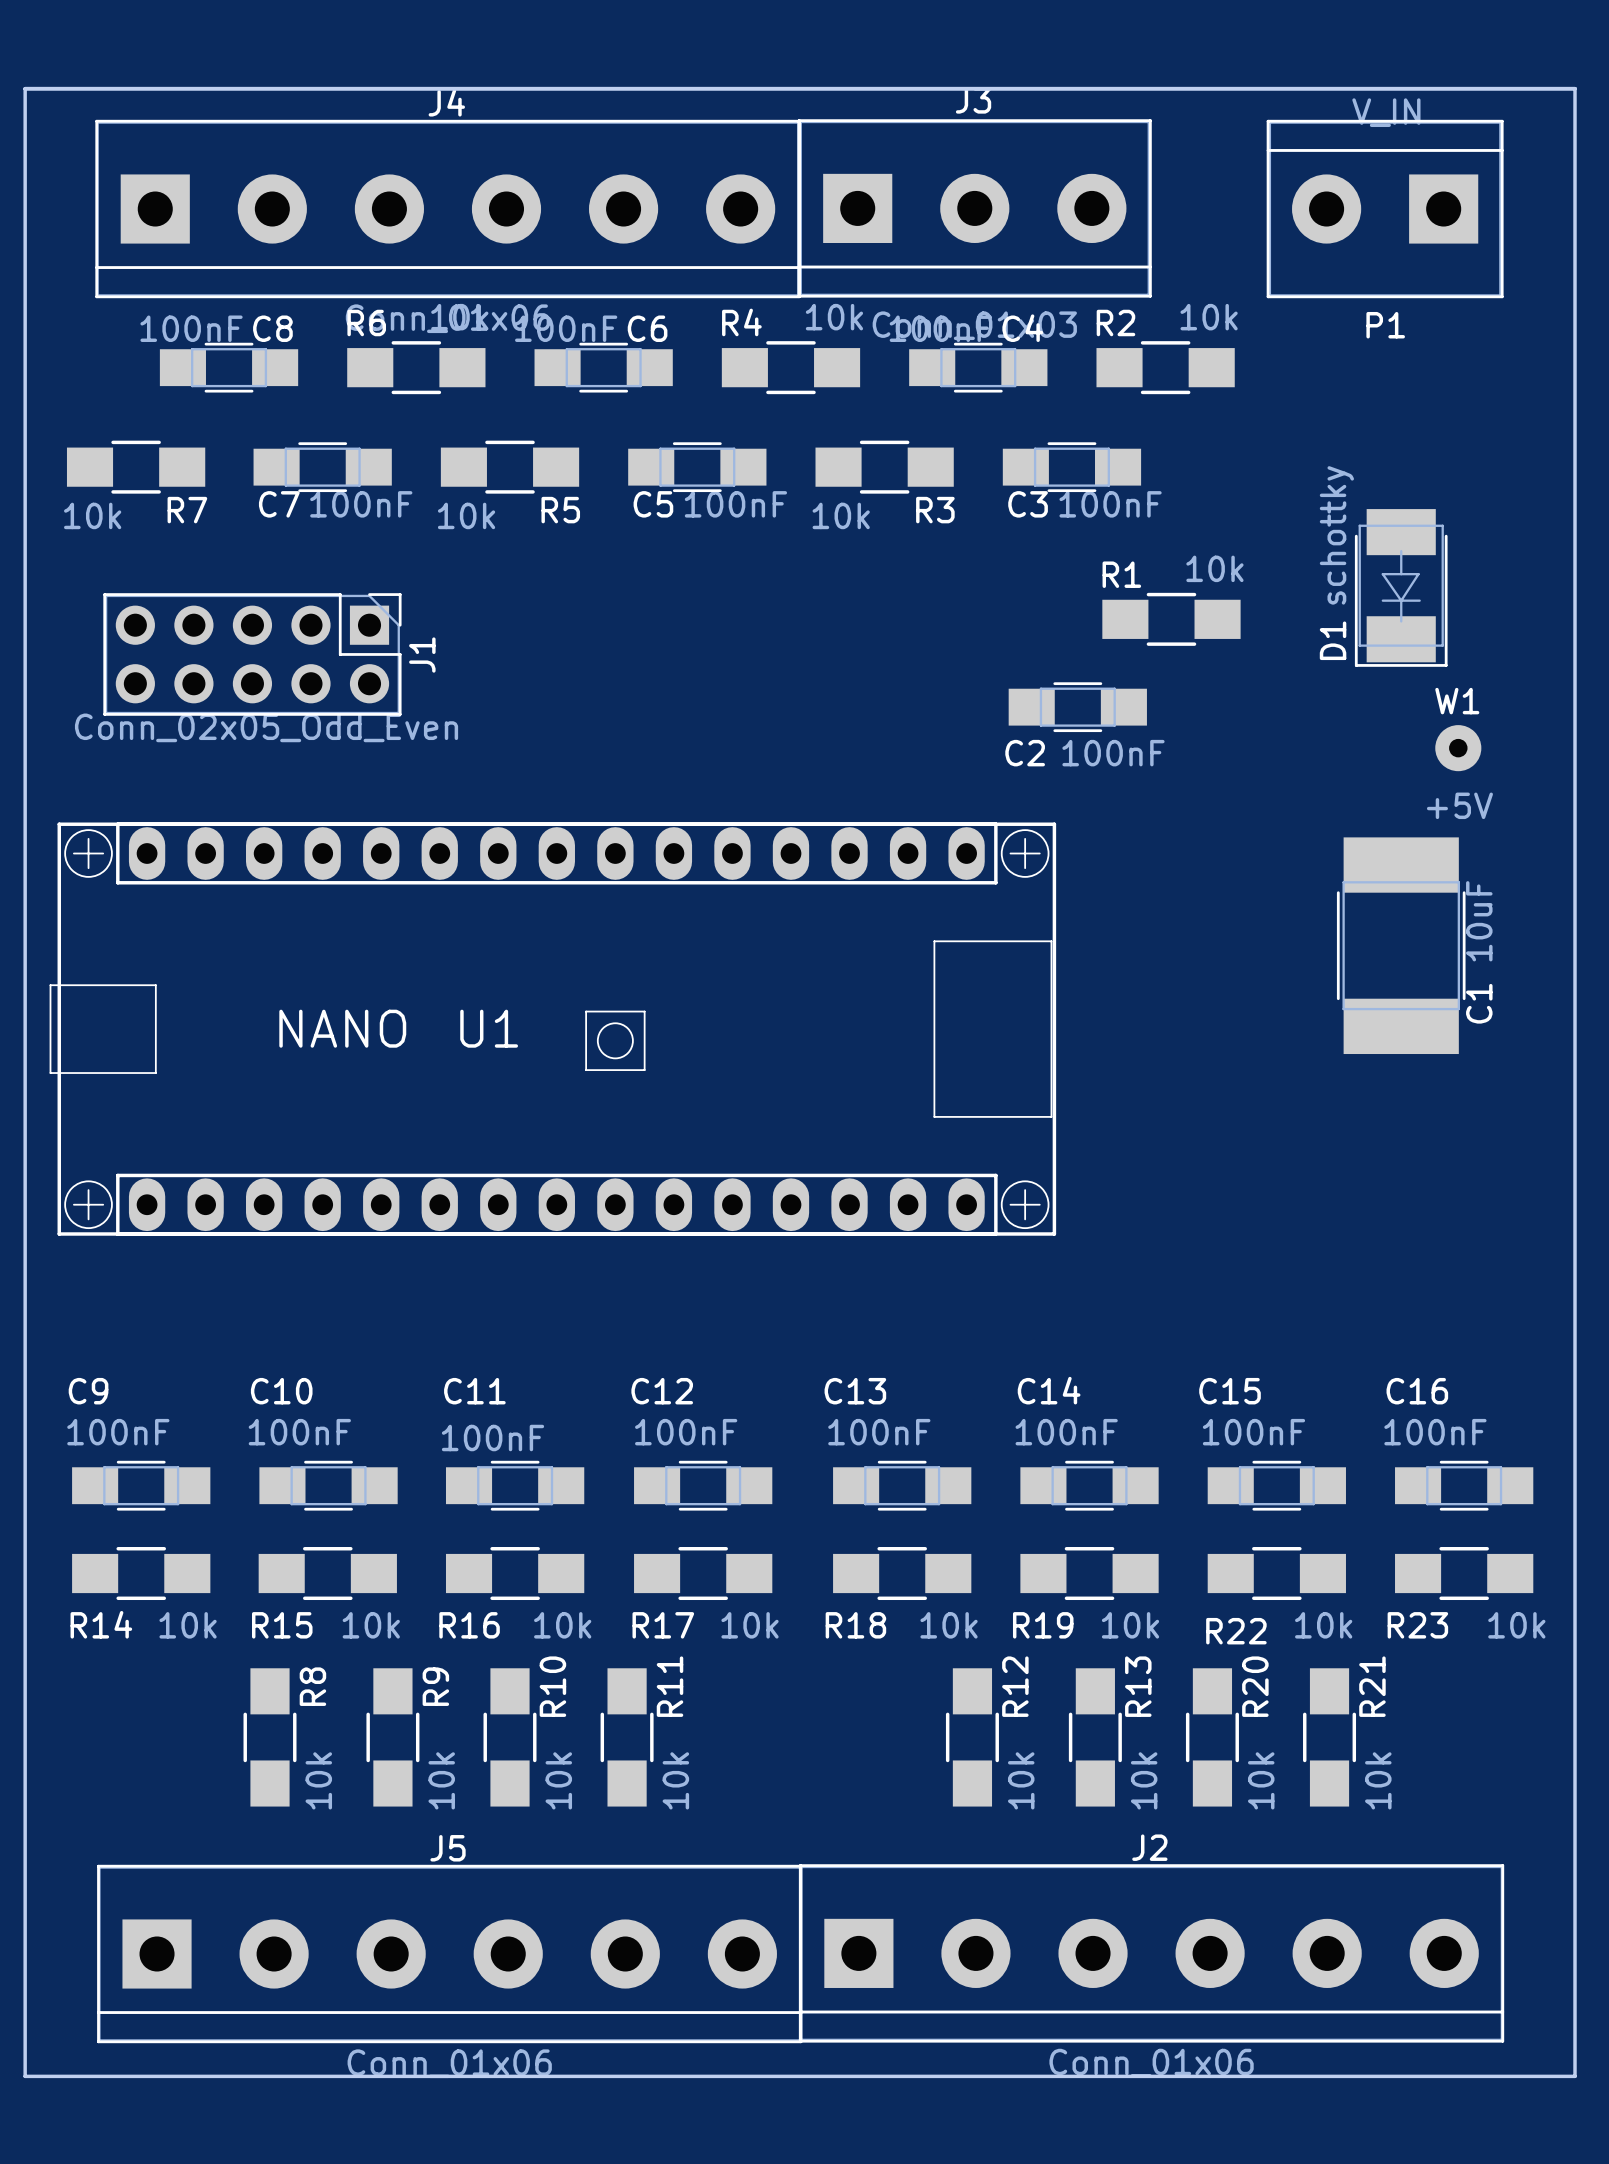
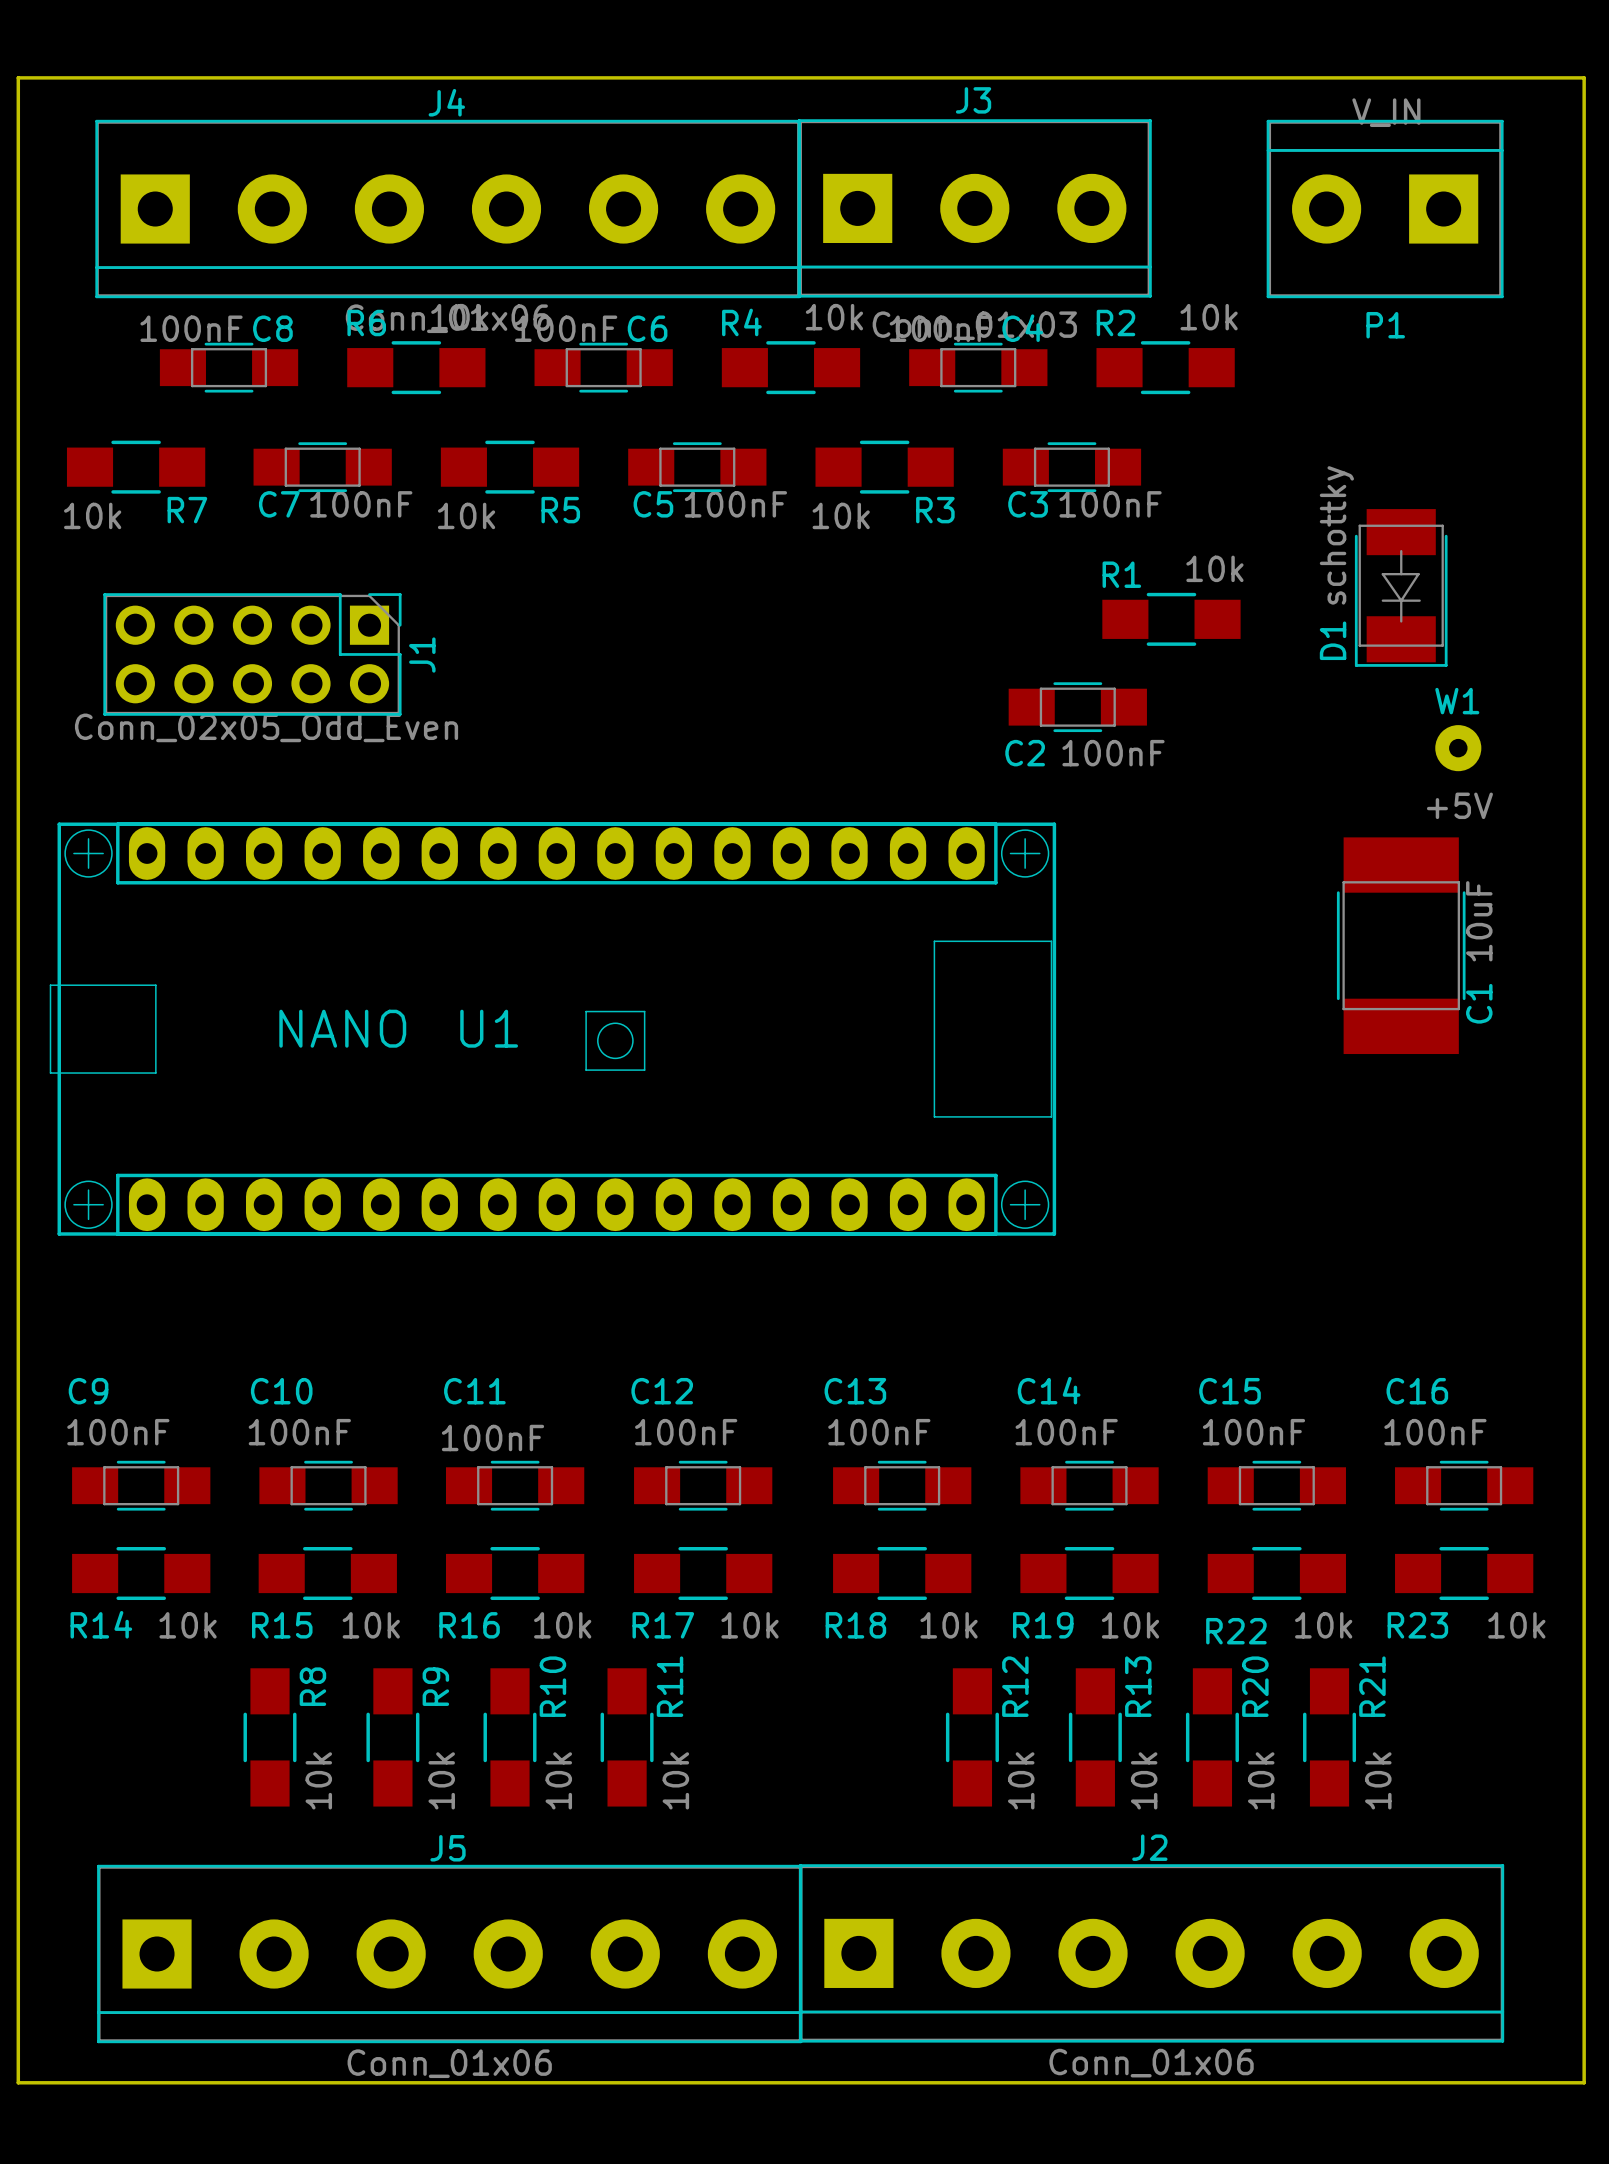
board edge: (25, 88) (25, 2076) (1575, 2076) (1575, 88) (25, 88) -> (18, 77) (18, 2082) (1584, 2082) (1584, 77) (18, 77)

